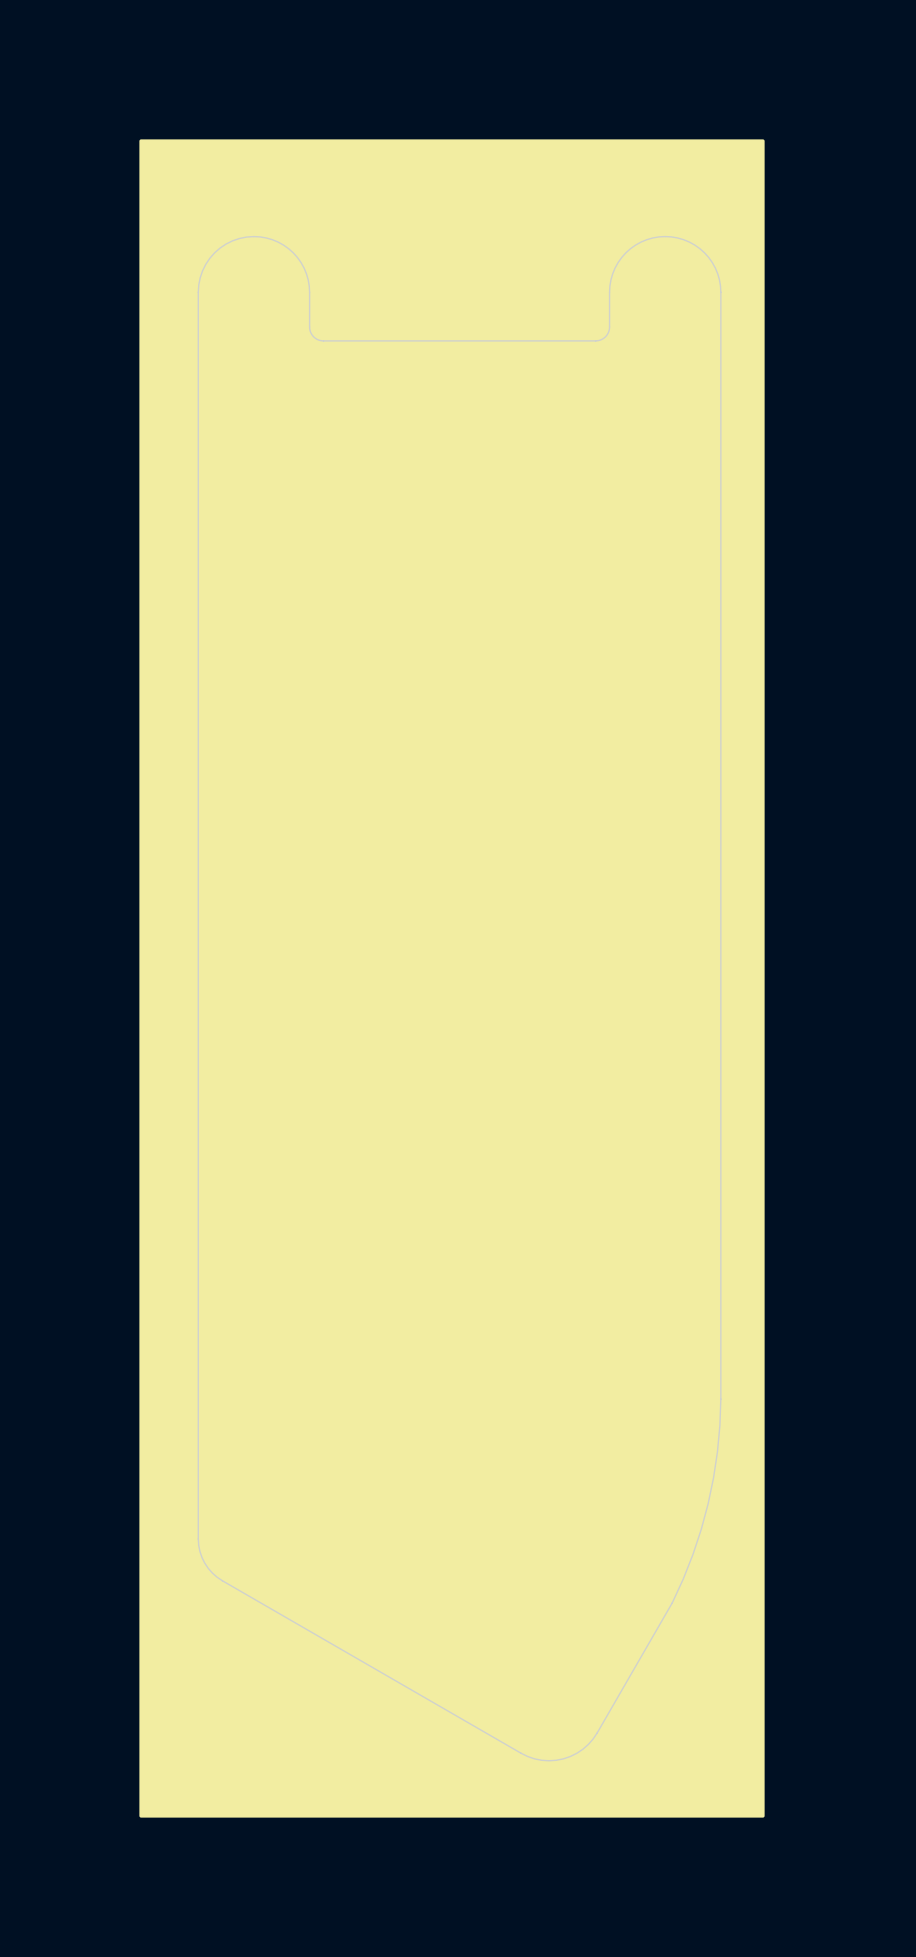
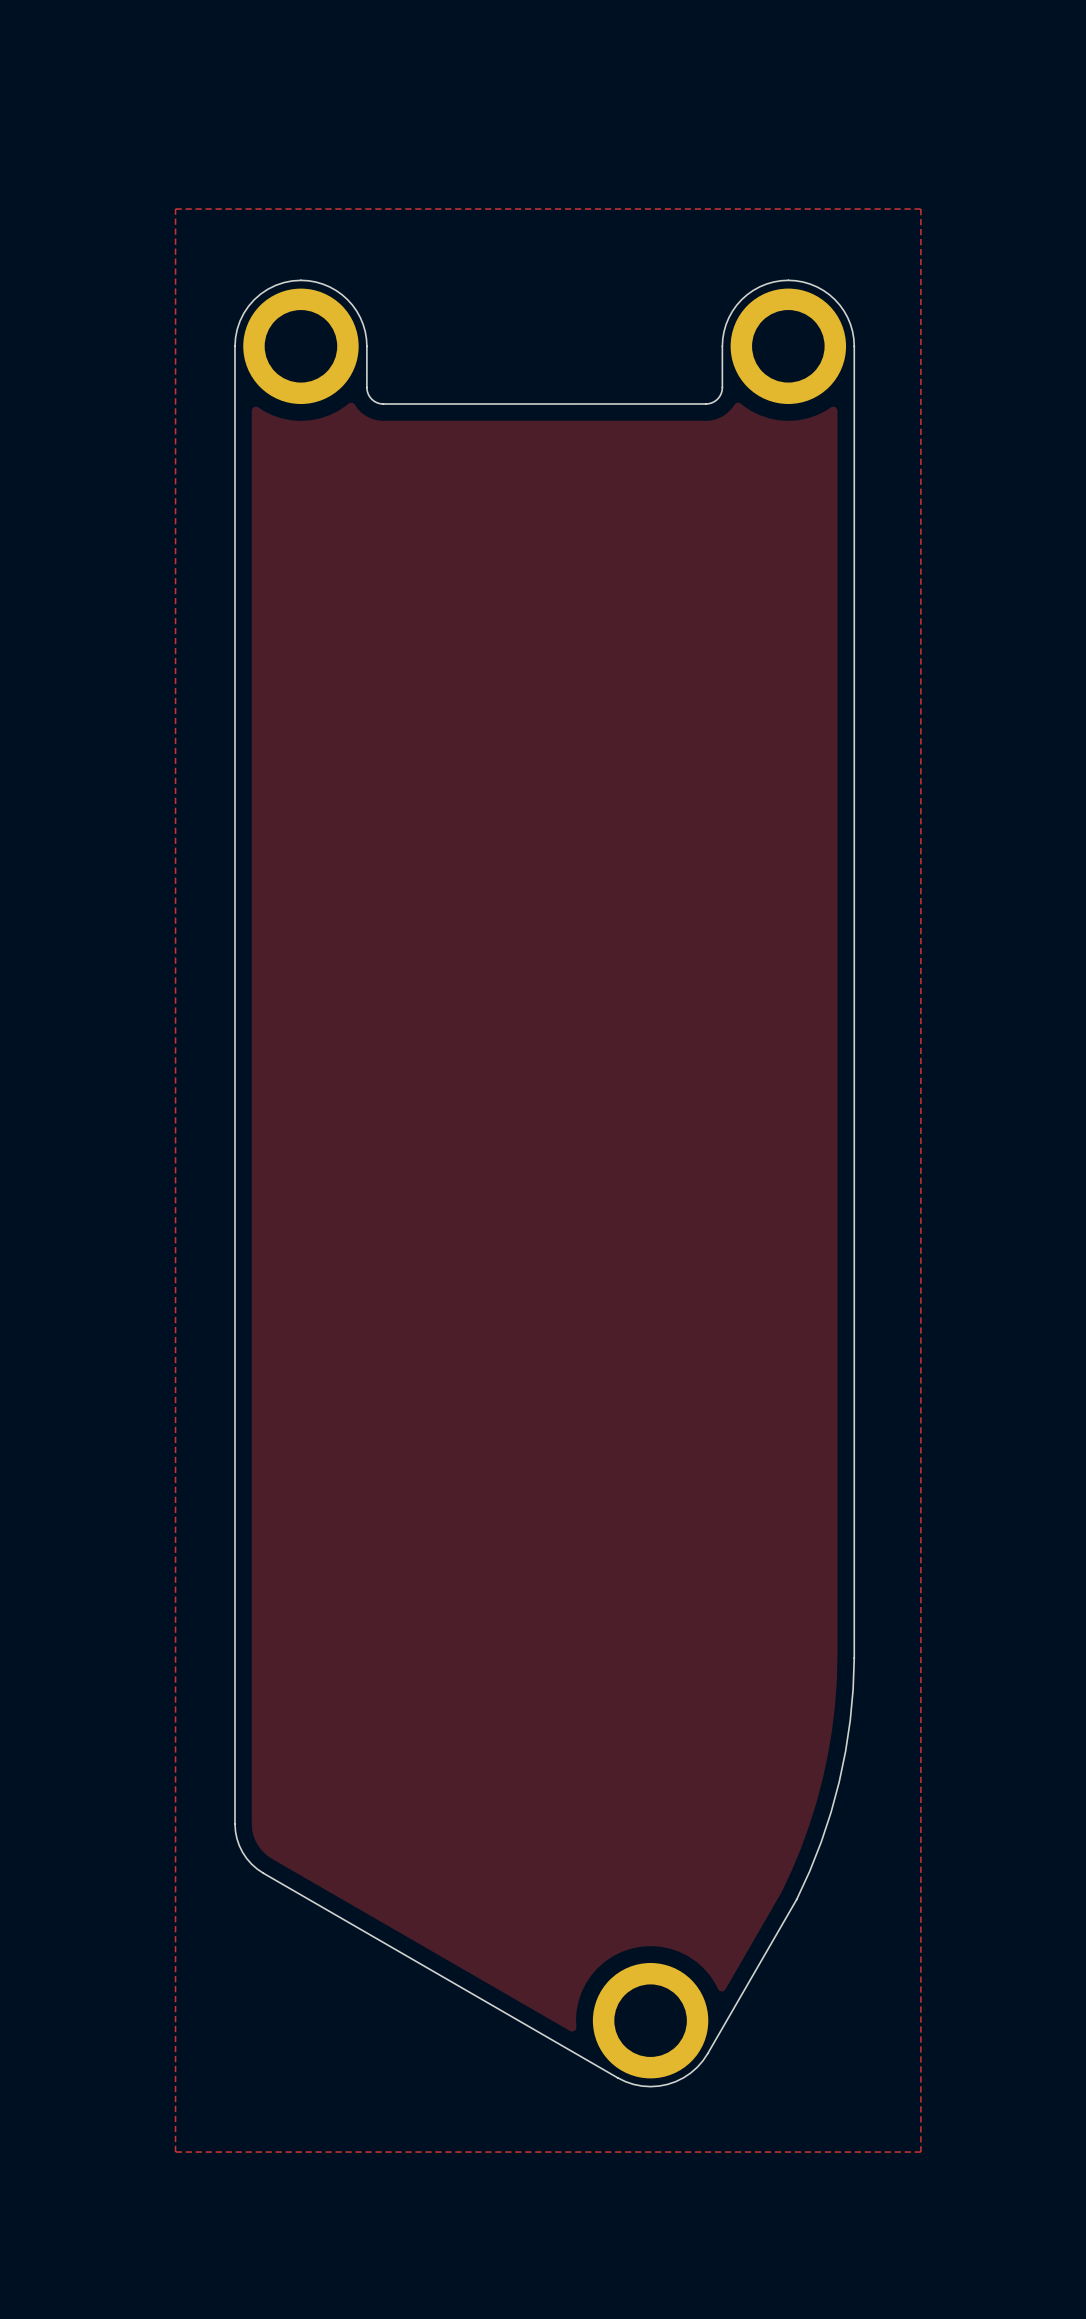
drawing: [139, 139, 765, 1818] -> none
zone outline: none -> (175, 209) (175, 2152) (920, 2152) (920, 209) (175, 209)

